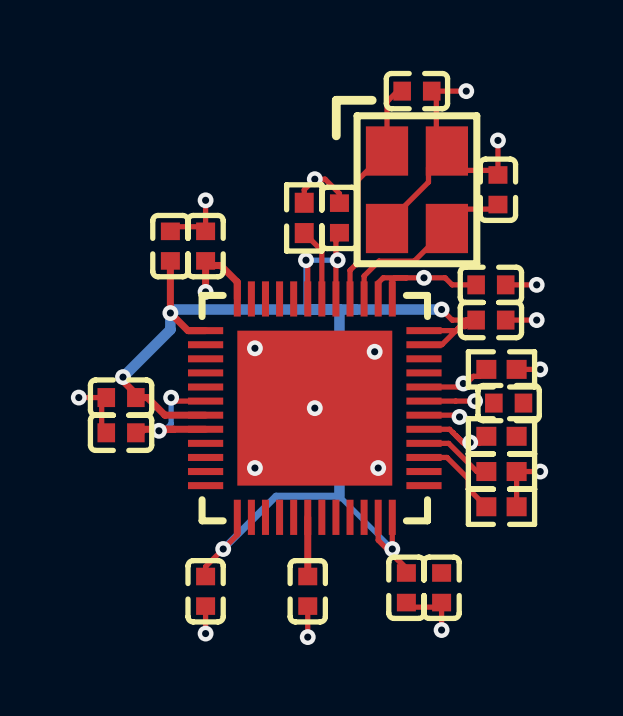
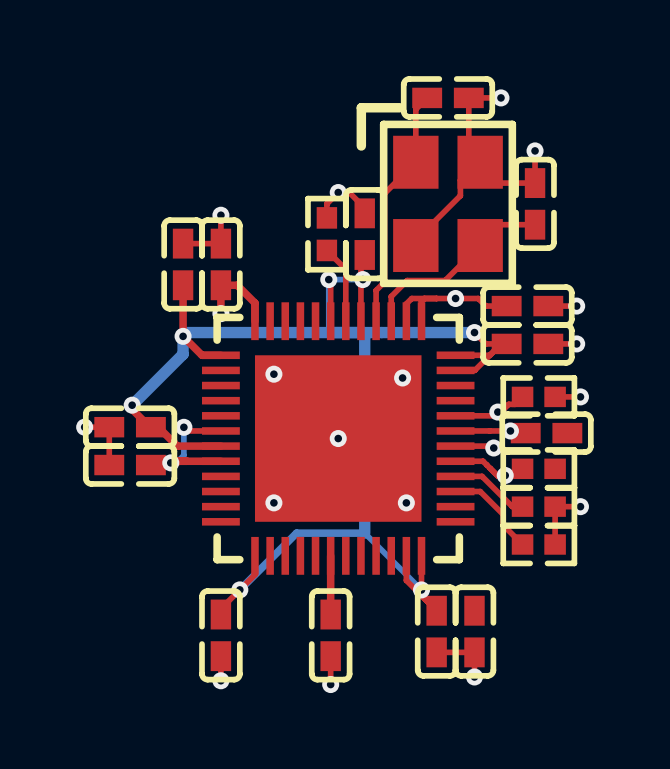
part footprint: [383, 70, 451, 112] -> [400, 76, 496, 120]
part footprint: [477, 156, 519, 224] -> [513, 156, 557, 252]
part footprint: [319, 184, 360, 252] -> [342, 187, 387, 282]
part footprint: [150, 212, 191, 280] -> [161, 217, 205, 312]
part footprint: [185, 212, 226, 280] -> [199, 217, 243, 312]
part footprint: [457, 264, 525, 306] -> [480, 284, 575, 328]
part footprint: [457, 299, 525, 341] -> [480, 322, 575, 366]
part footprint: [87, 377, 155, 418] -> [82, 405, 178, 449]
part footprint: [475, 382, 542, 424] -> [499, 411, 594, 455]
part footprint: [87, 412, 155, 454] -> [82, 443, 178, 487]
part footprint: [386, 554, 427, 622] -> [414, 584, 459, 679]
part footprint: [421, 554, 462, 622] -> [452, 584, 497, 679]
part footprint: [185, 558, 226, 625] -> [199, 588, 243, 683]
part footprint: [287, 558, 329, 625] -> [308, 588, 353, 683]

